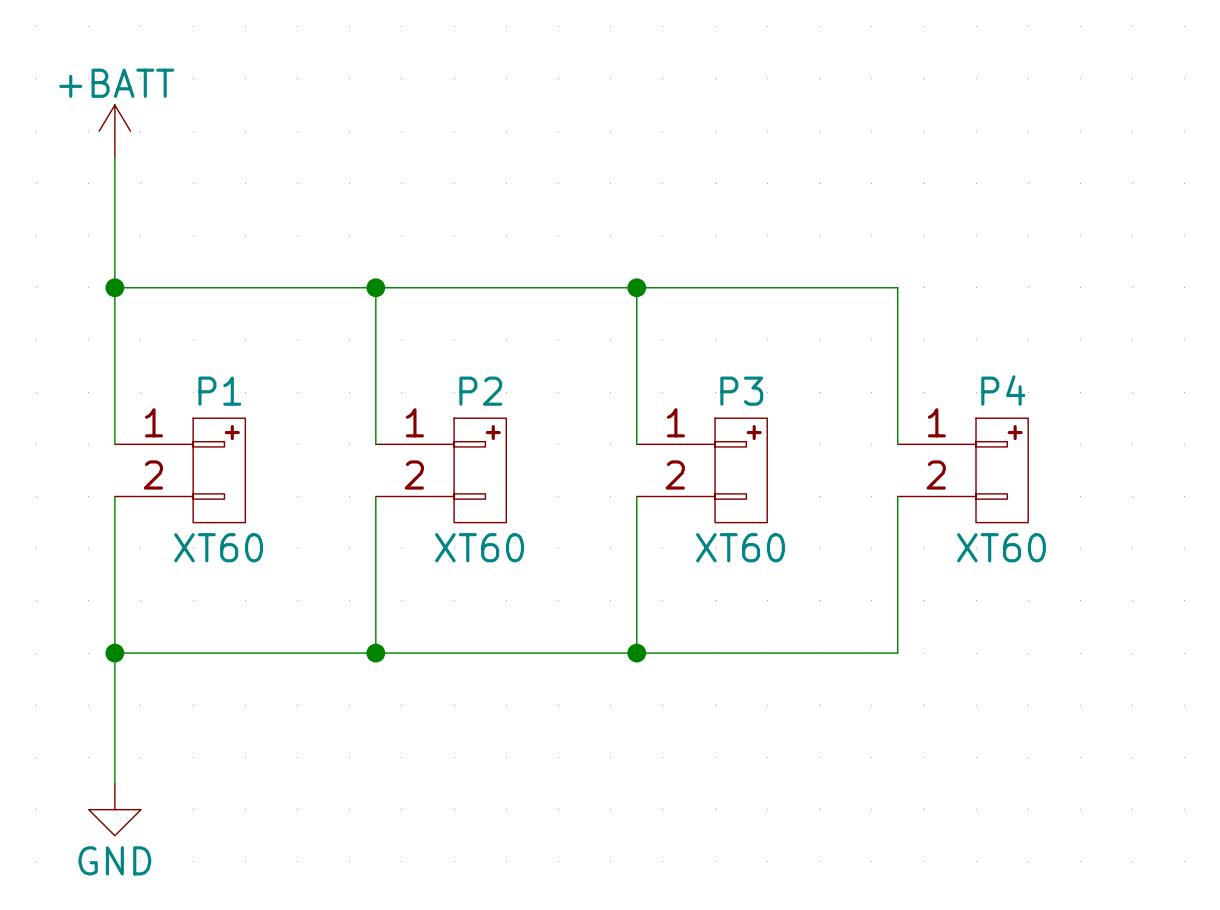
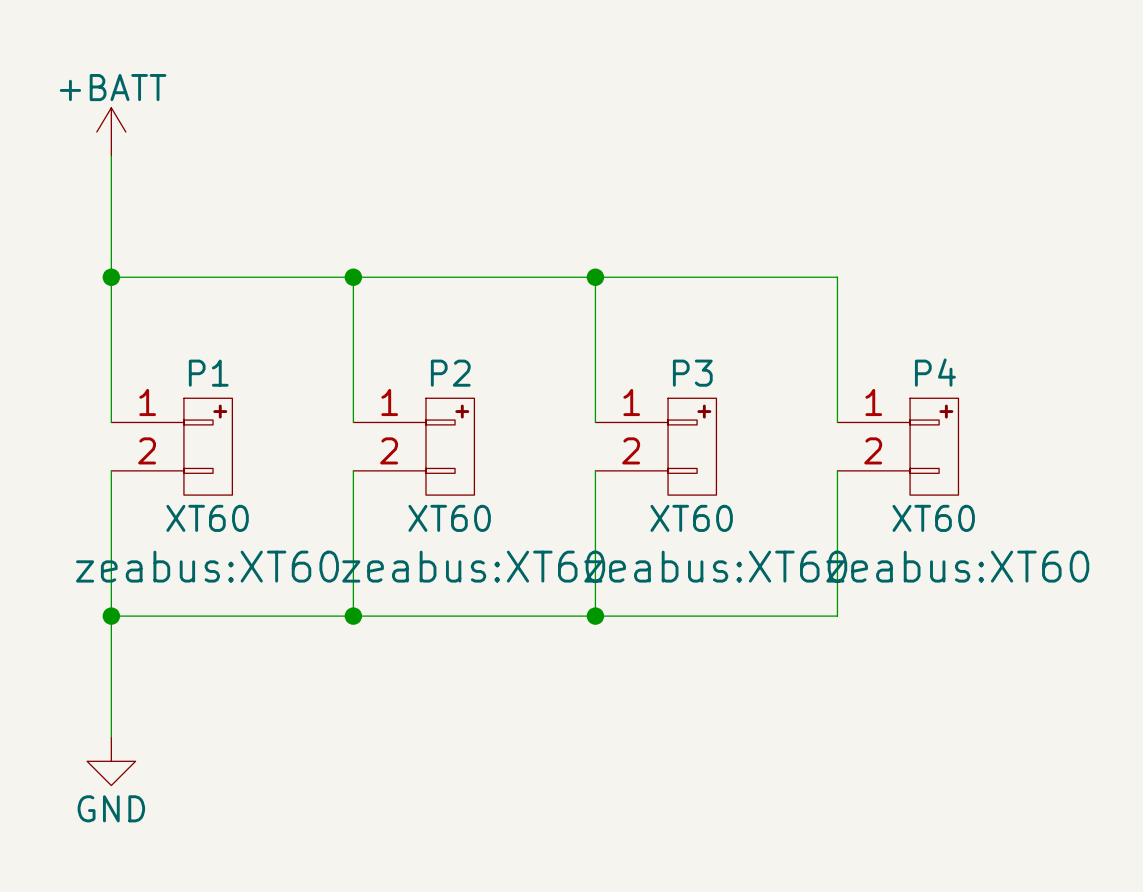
P1 text: none -> zeabus:XT60 (207, 566)
P2 text: none -> zeabus:XT60 (473, 566)
P3 text: none -> zeabus:XT60 (715, 566)
P4 text: none -> zeabus:XT60 (957, 566)

